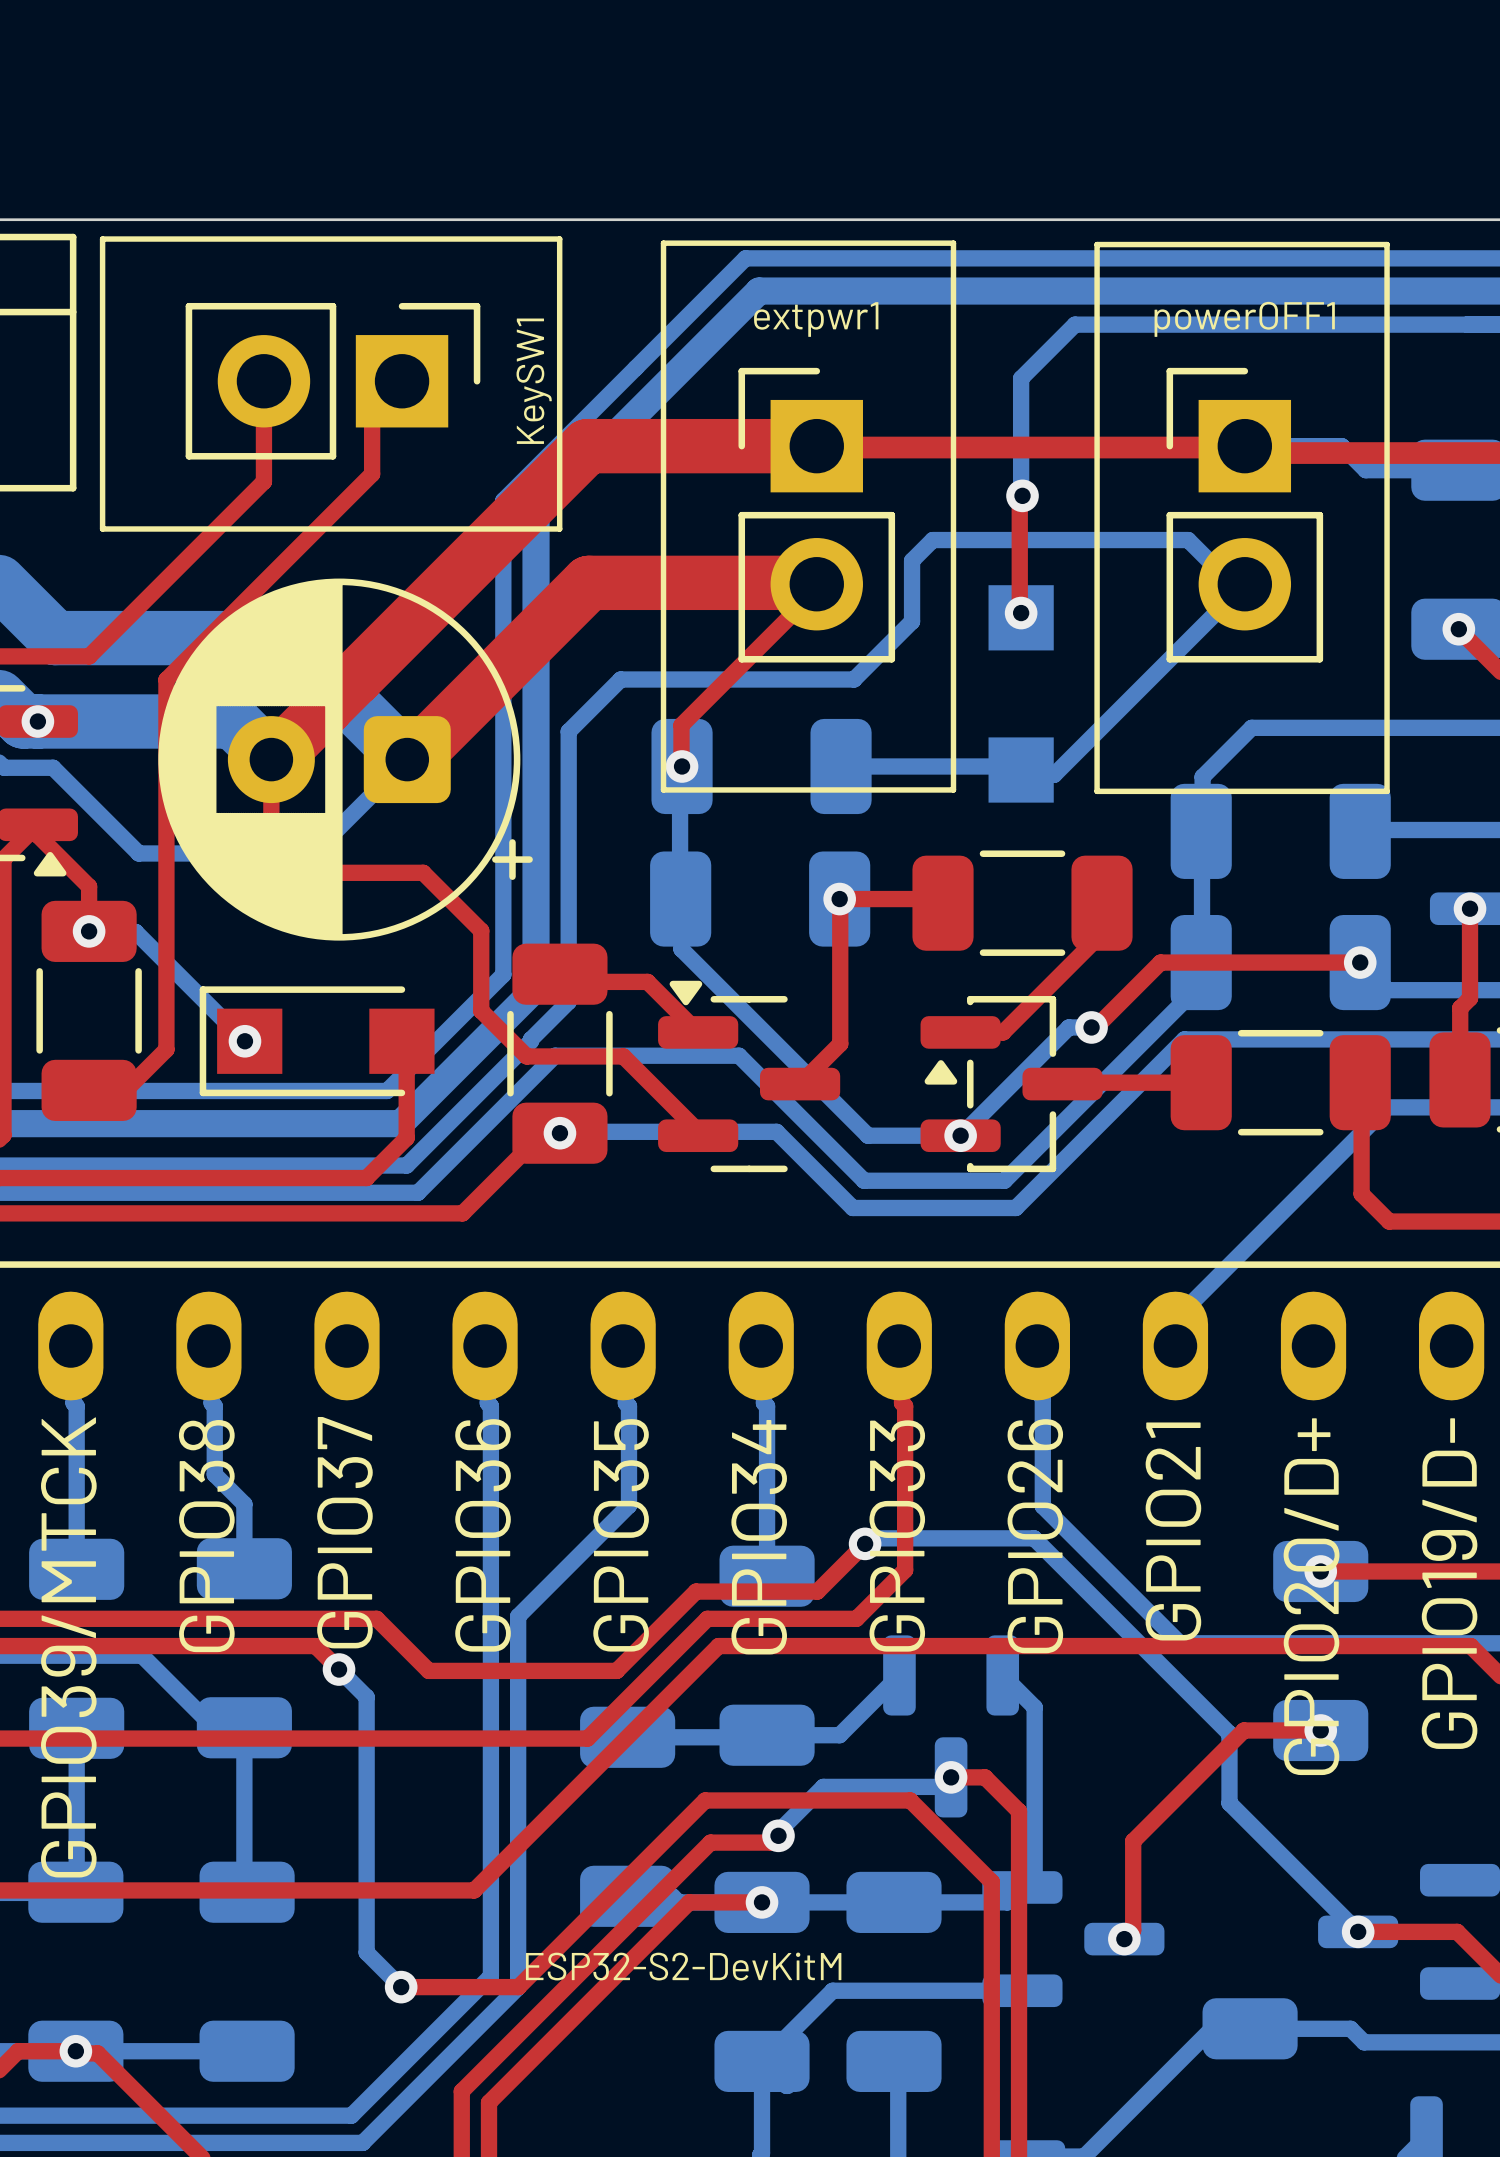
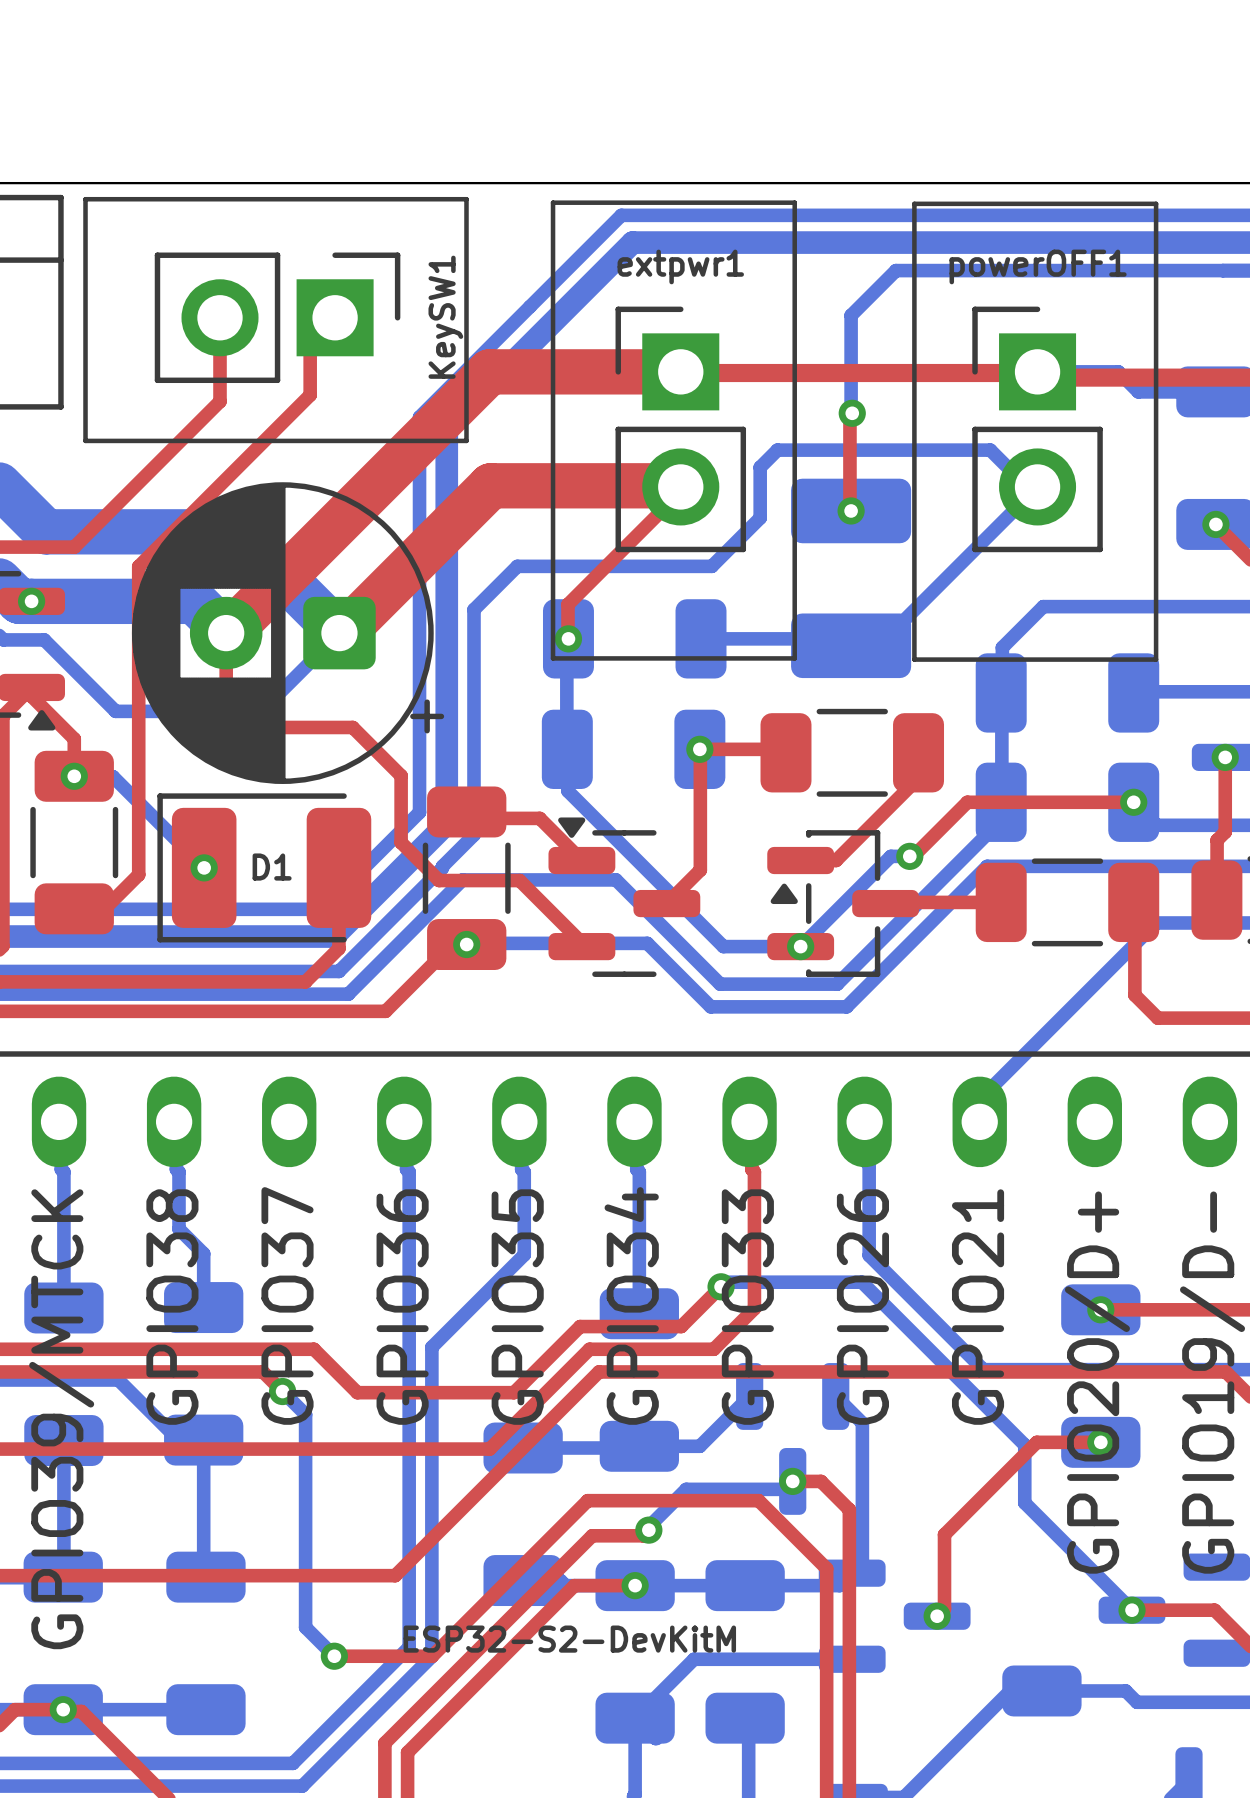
part footprint: [988, 585, 1054, 803] -> [791, 478, 912, 679]
part: (317, 1041) -> none
D1: none -> (264, 867)

